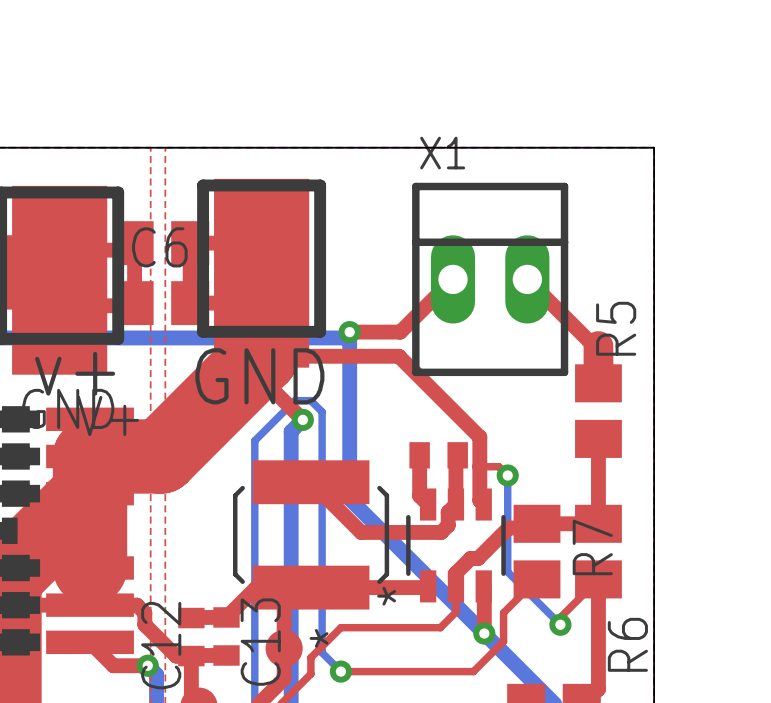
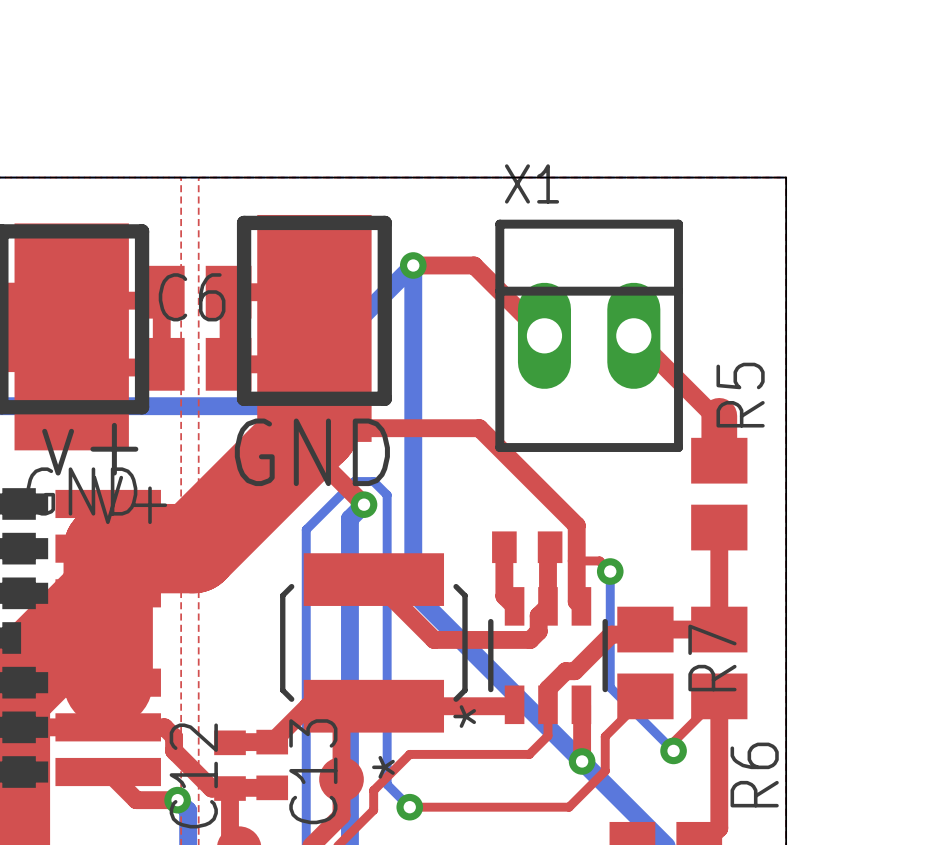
top track: (453, 279) (400, 332) (349, 332) -> (544, 335) (474, 265) (413, 265)
via position: (349, 332) -> (413, 265)
bottom track: (226, 337) (343, 337) (349, 332) (349, 498) -> (272, 406) (413, 265) (413, 592) (420, 599)

